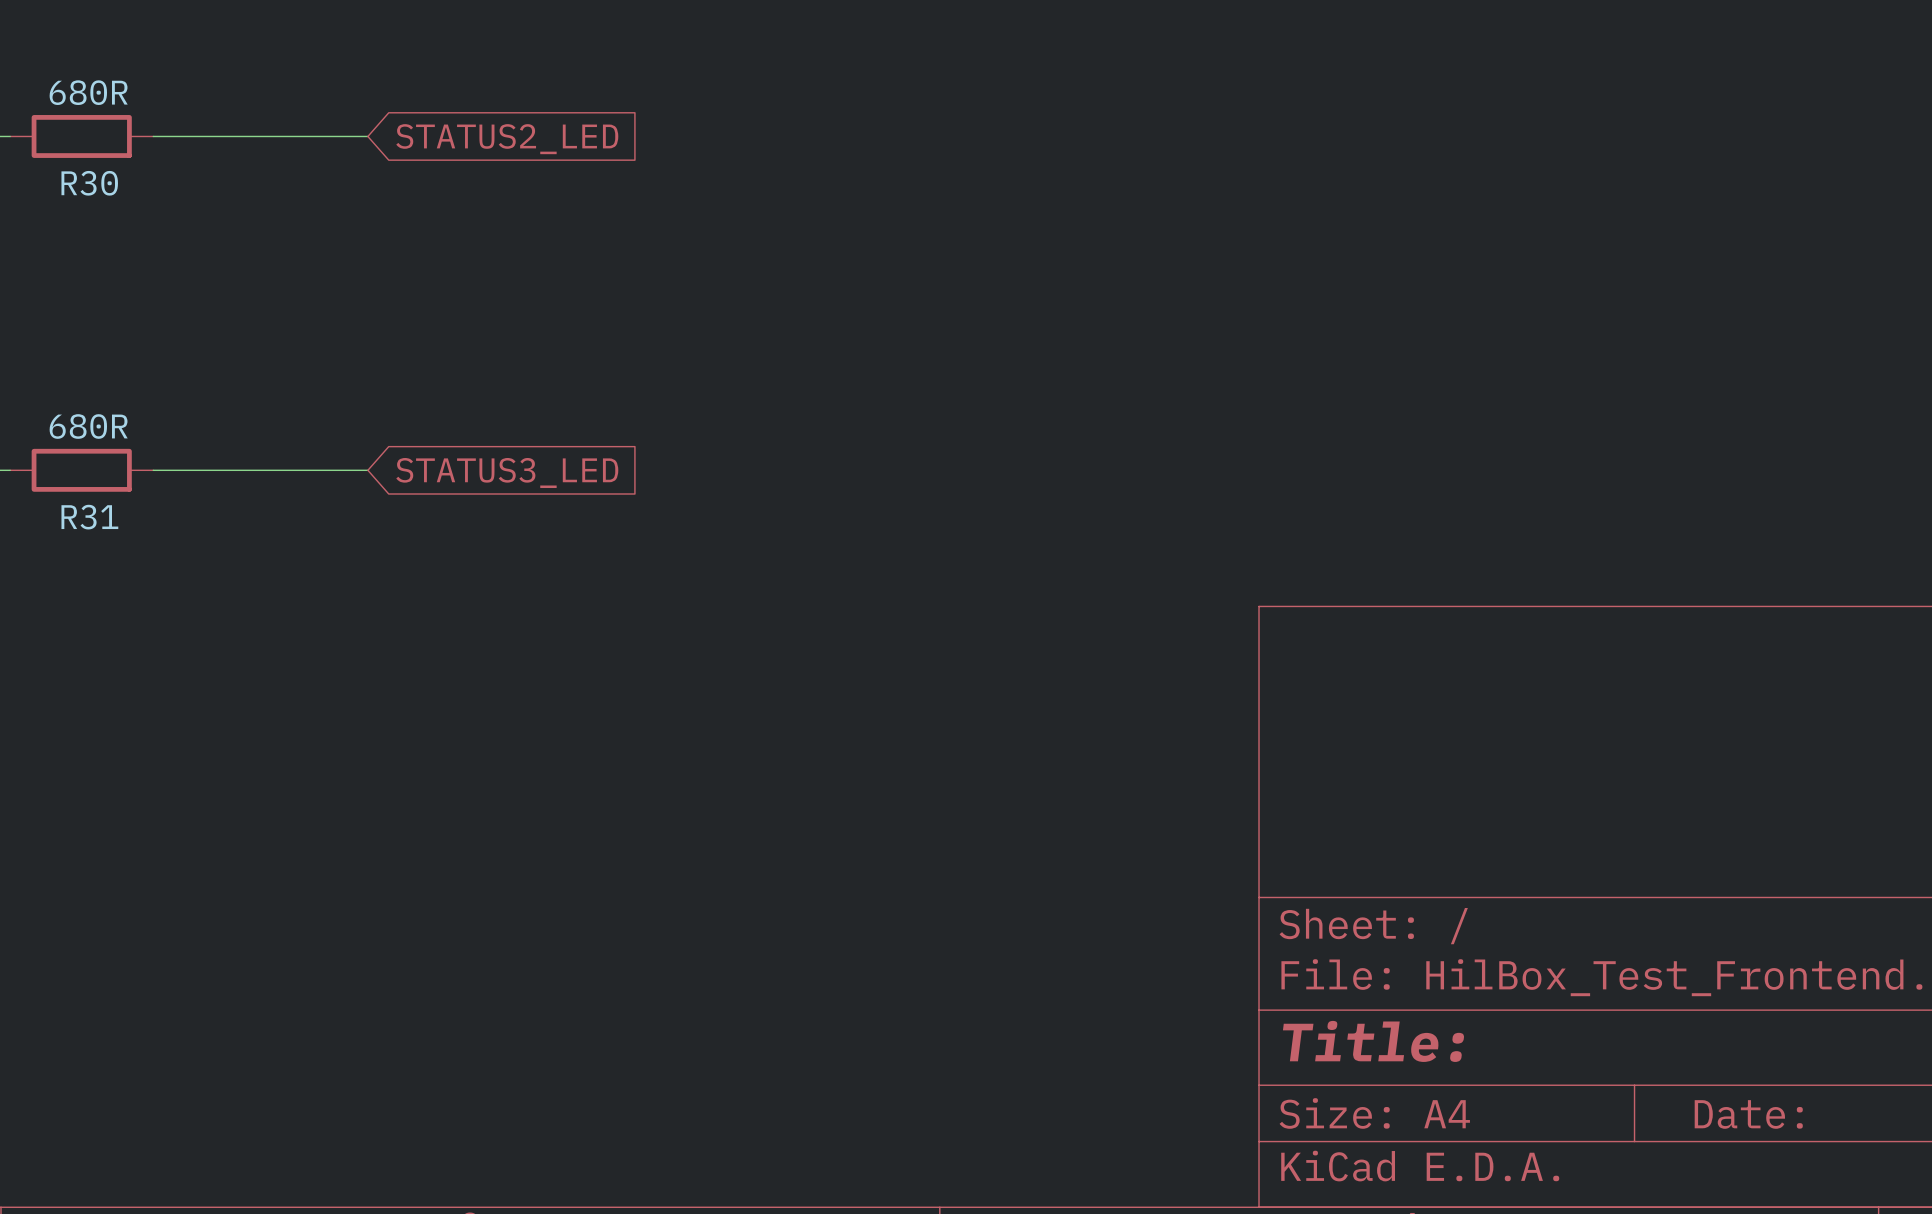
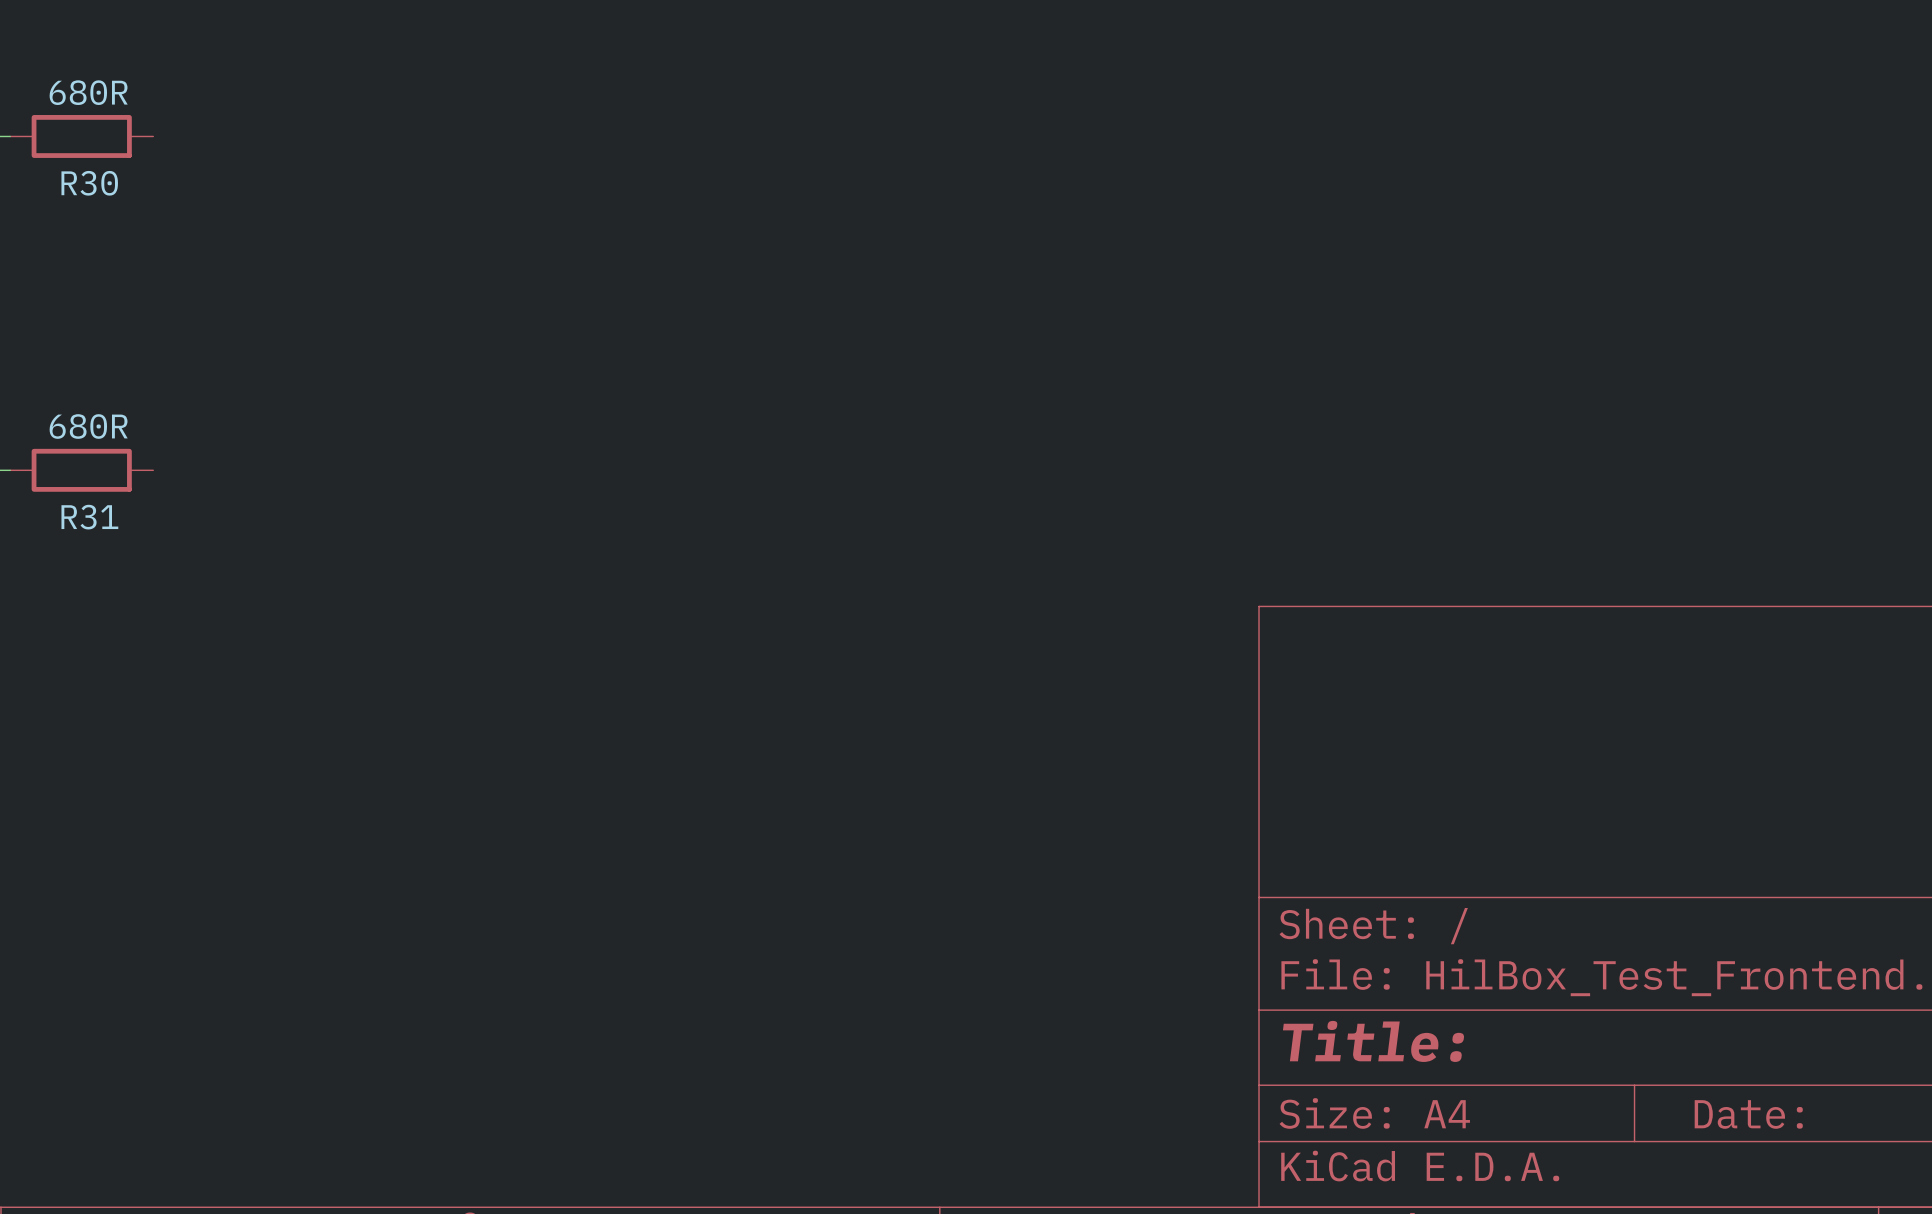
wire: (153, 136) (367, 136) -> none
global label: STATUS2_LED (507, 139) -> none
wire: (153, 470) (367, 470) -> none
global label: STATUS3_LED (507, 473) -> none

